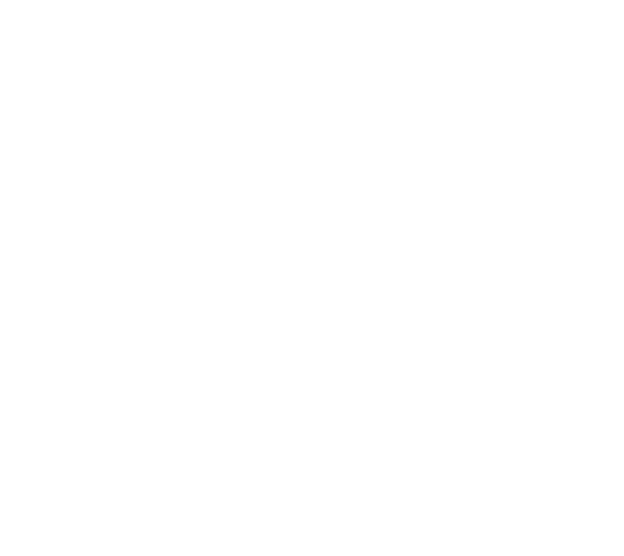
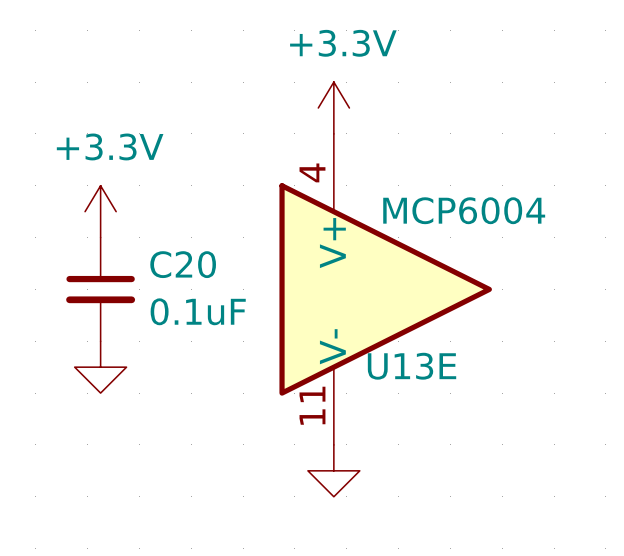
power symbol: none -> +3.3V (333, 108)
power symbol: none -> +3.3V (100, 211)
C20: none -> 0.1uF (100, 289)
U13E: none -> MCP6004 (385, 289)
power symbol: none -> (100, 367)
power symbol: none -> (333, 470)

